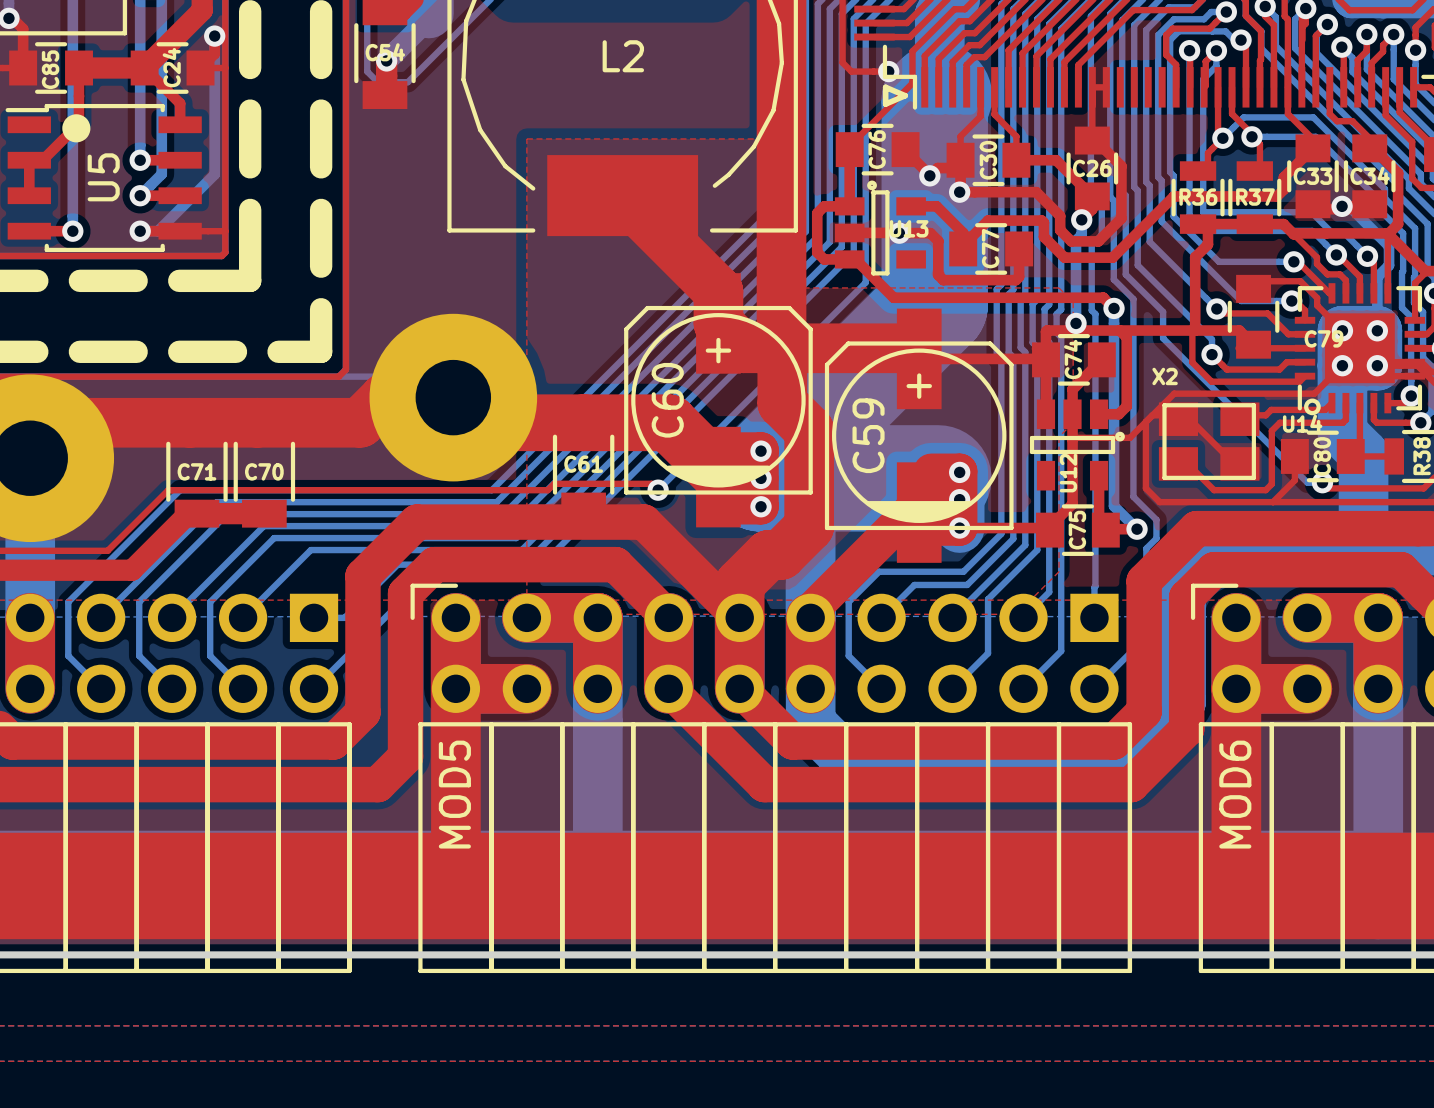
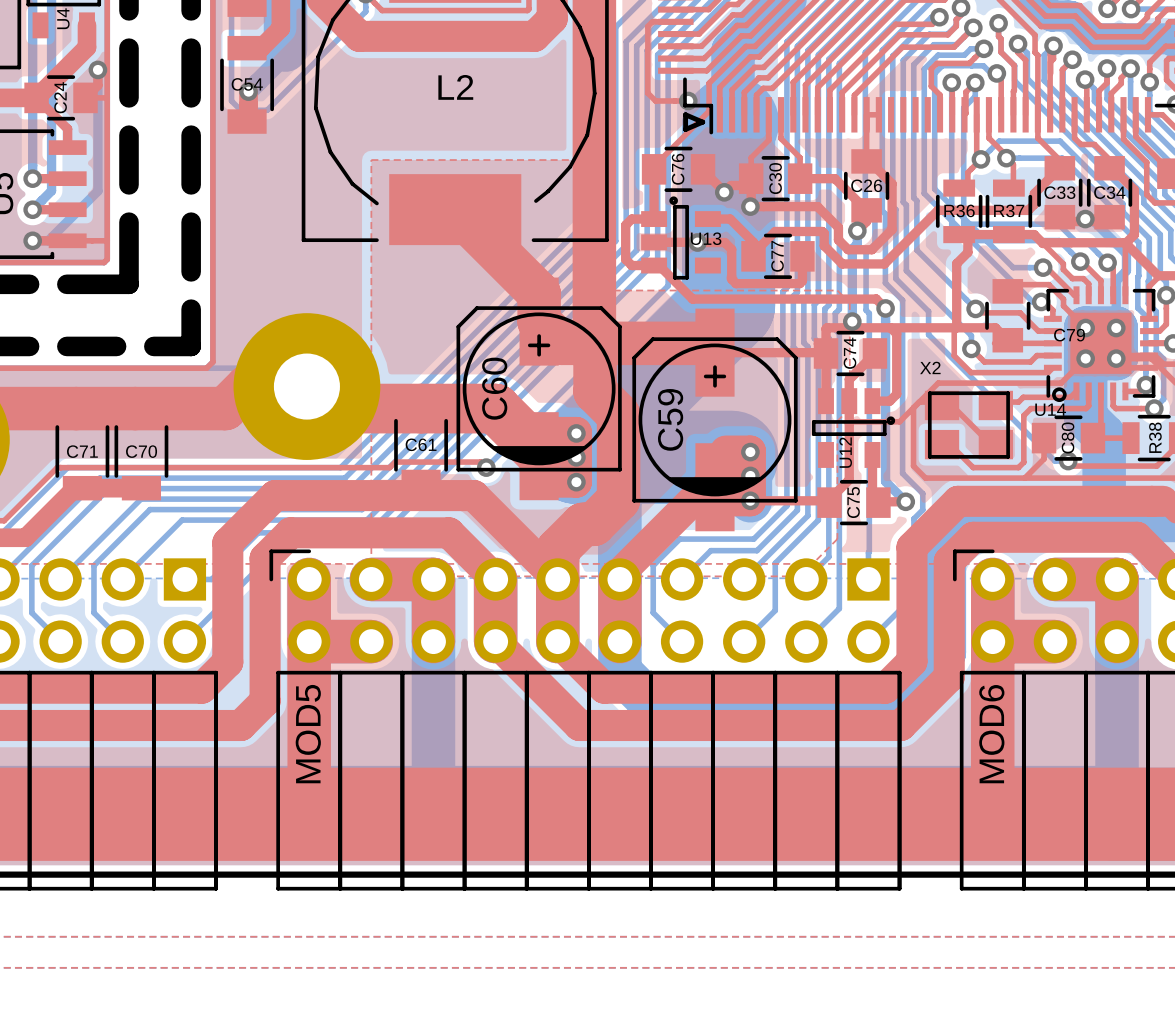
bottom track: (1173, 175) (1173, 216) (1218, 261) (1259, 261) -> (937, 192) (1013, 267)
bottom track: (1161, 180) (1161, 221) (1241, 301) (1282, 301) -> (927, 196) (1032, 301)

